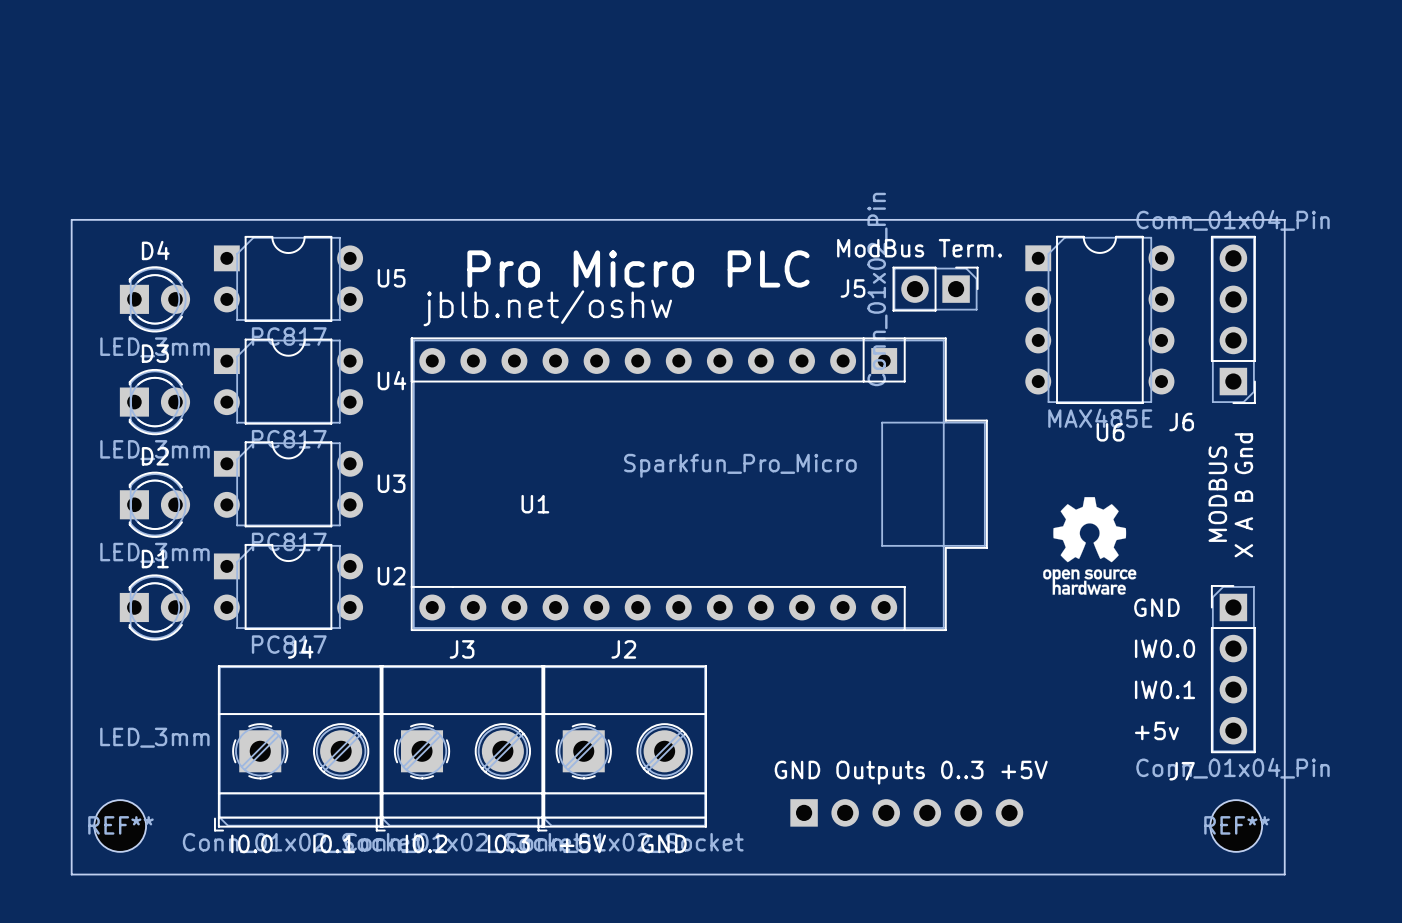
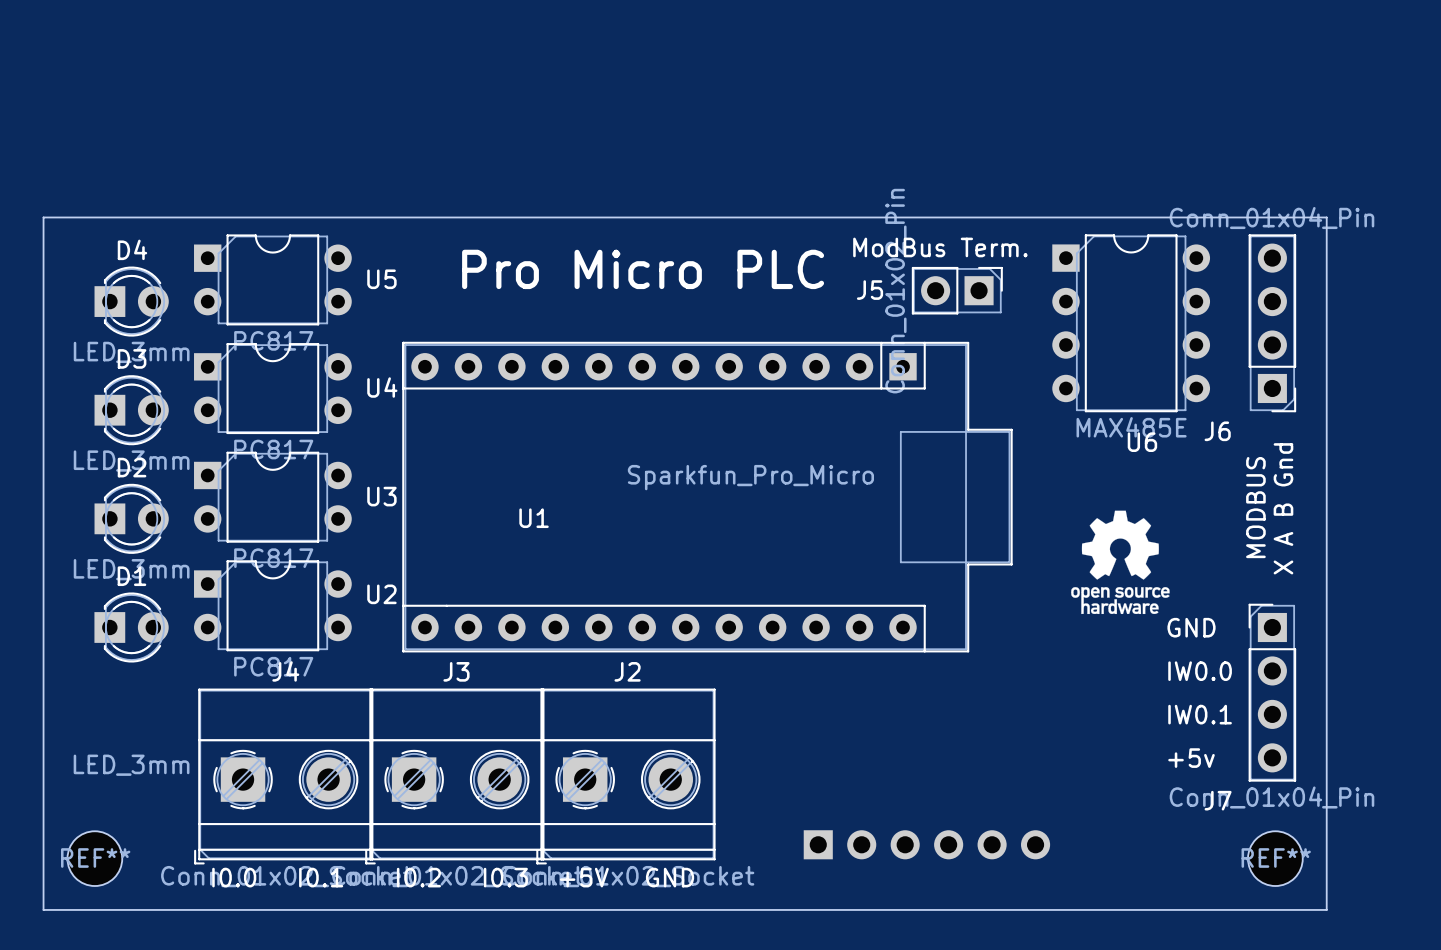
text: jblb.net/oshw (547, 308) -> none
text: GND (797, 769) -> none
text: +5V (1024, 769) -> none
text: Outputs 0..3 (909, 772) -> none

